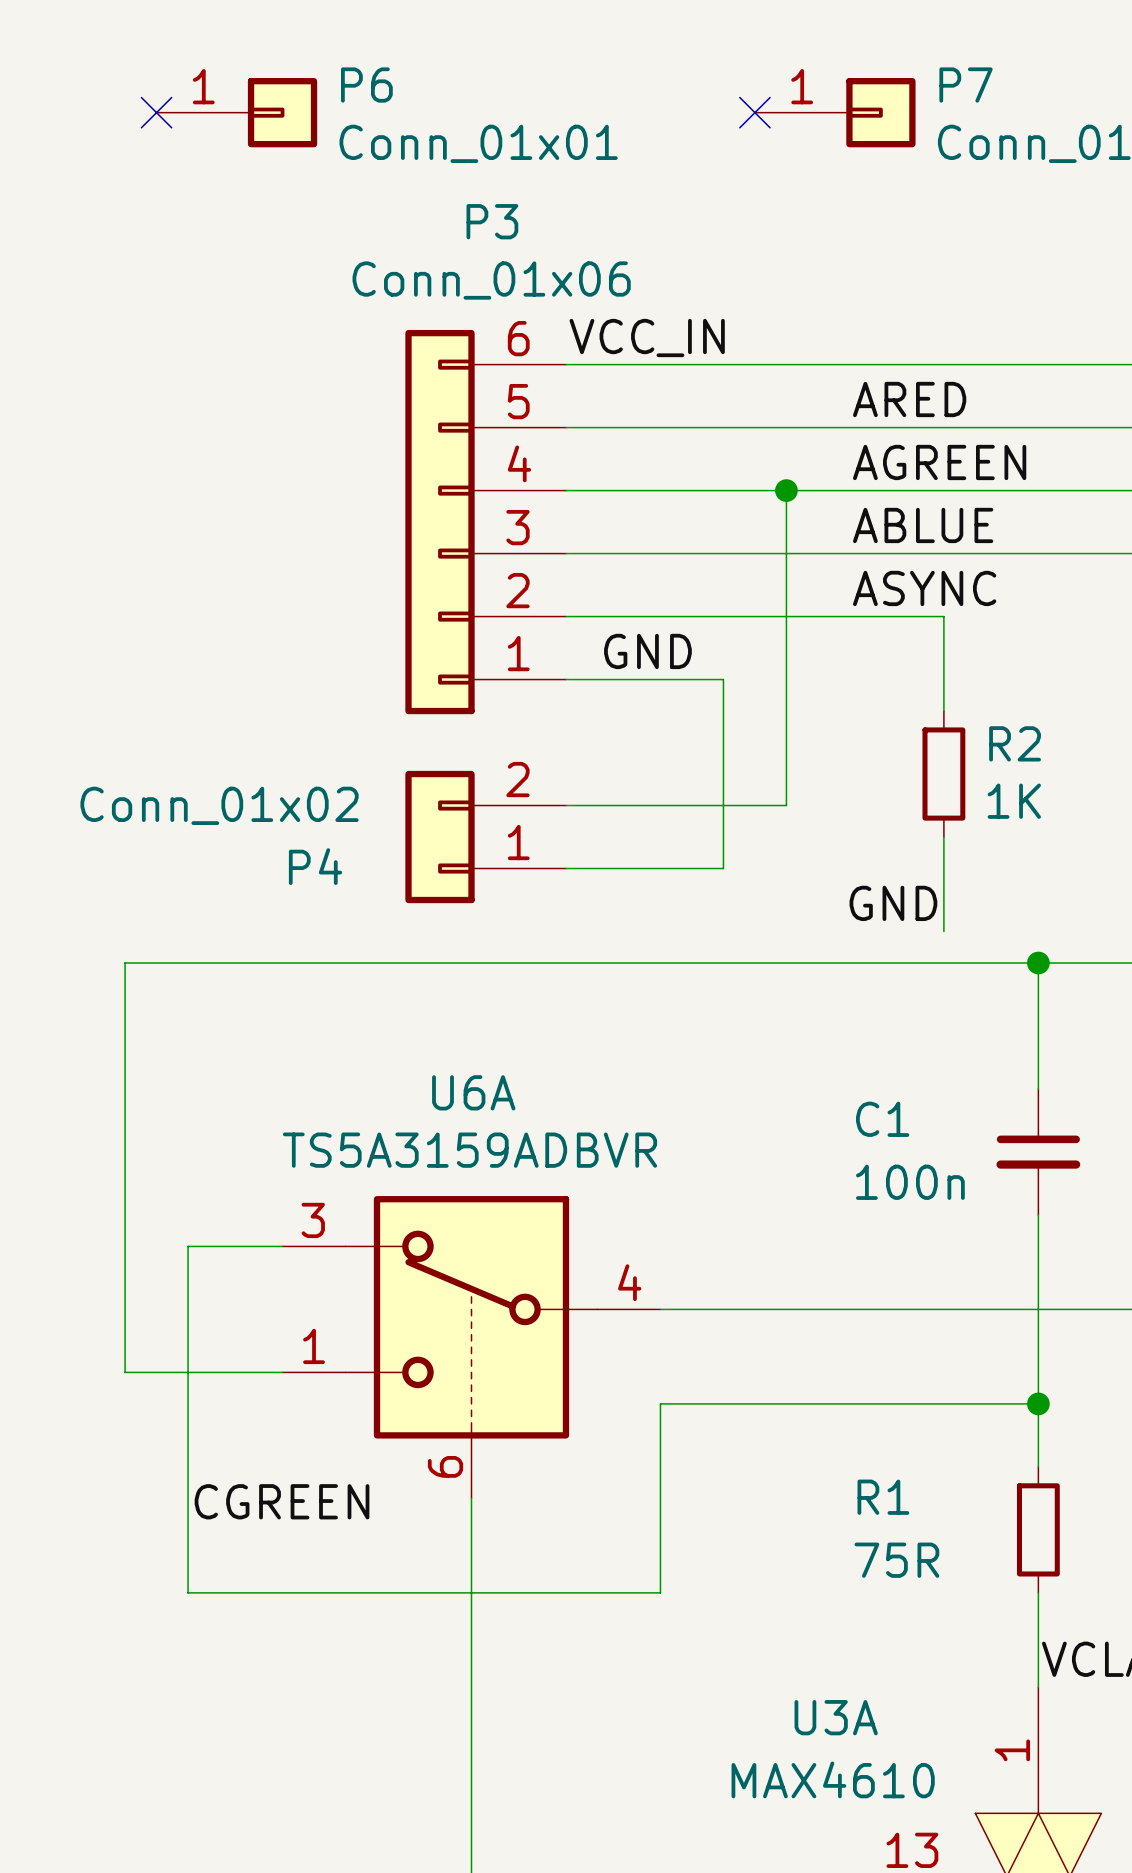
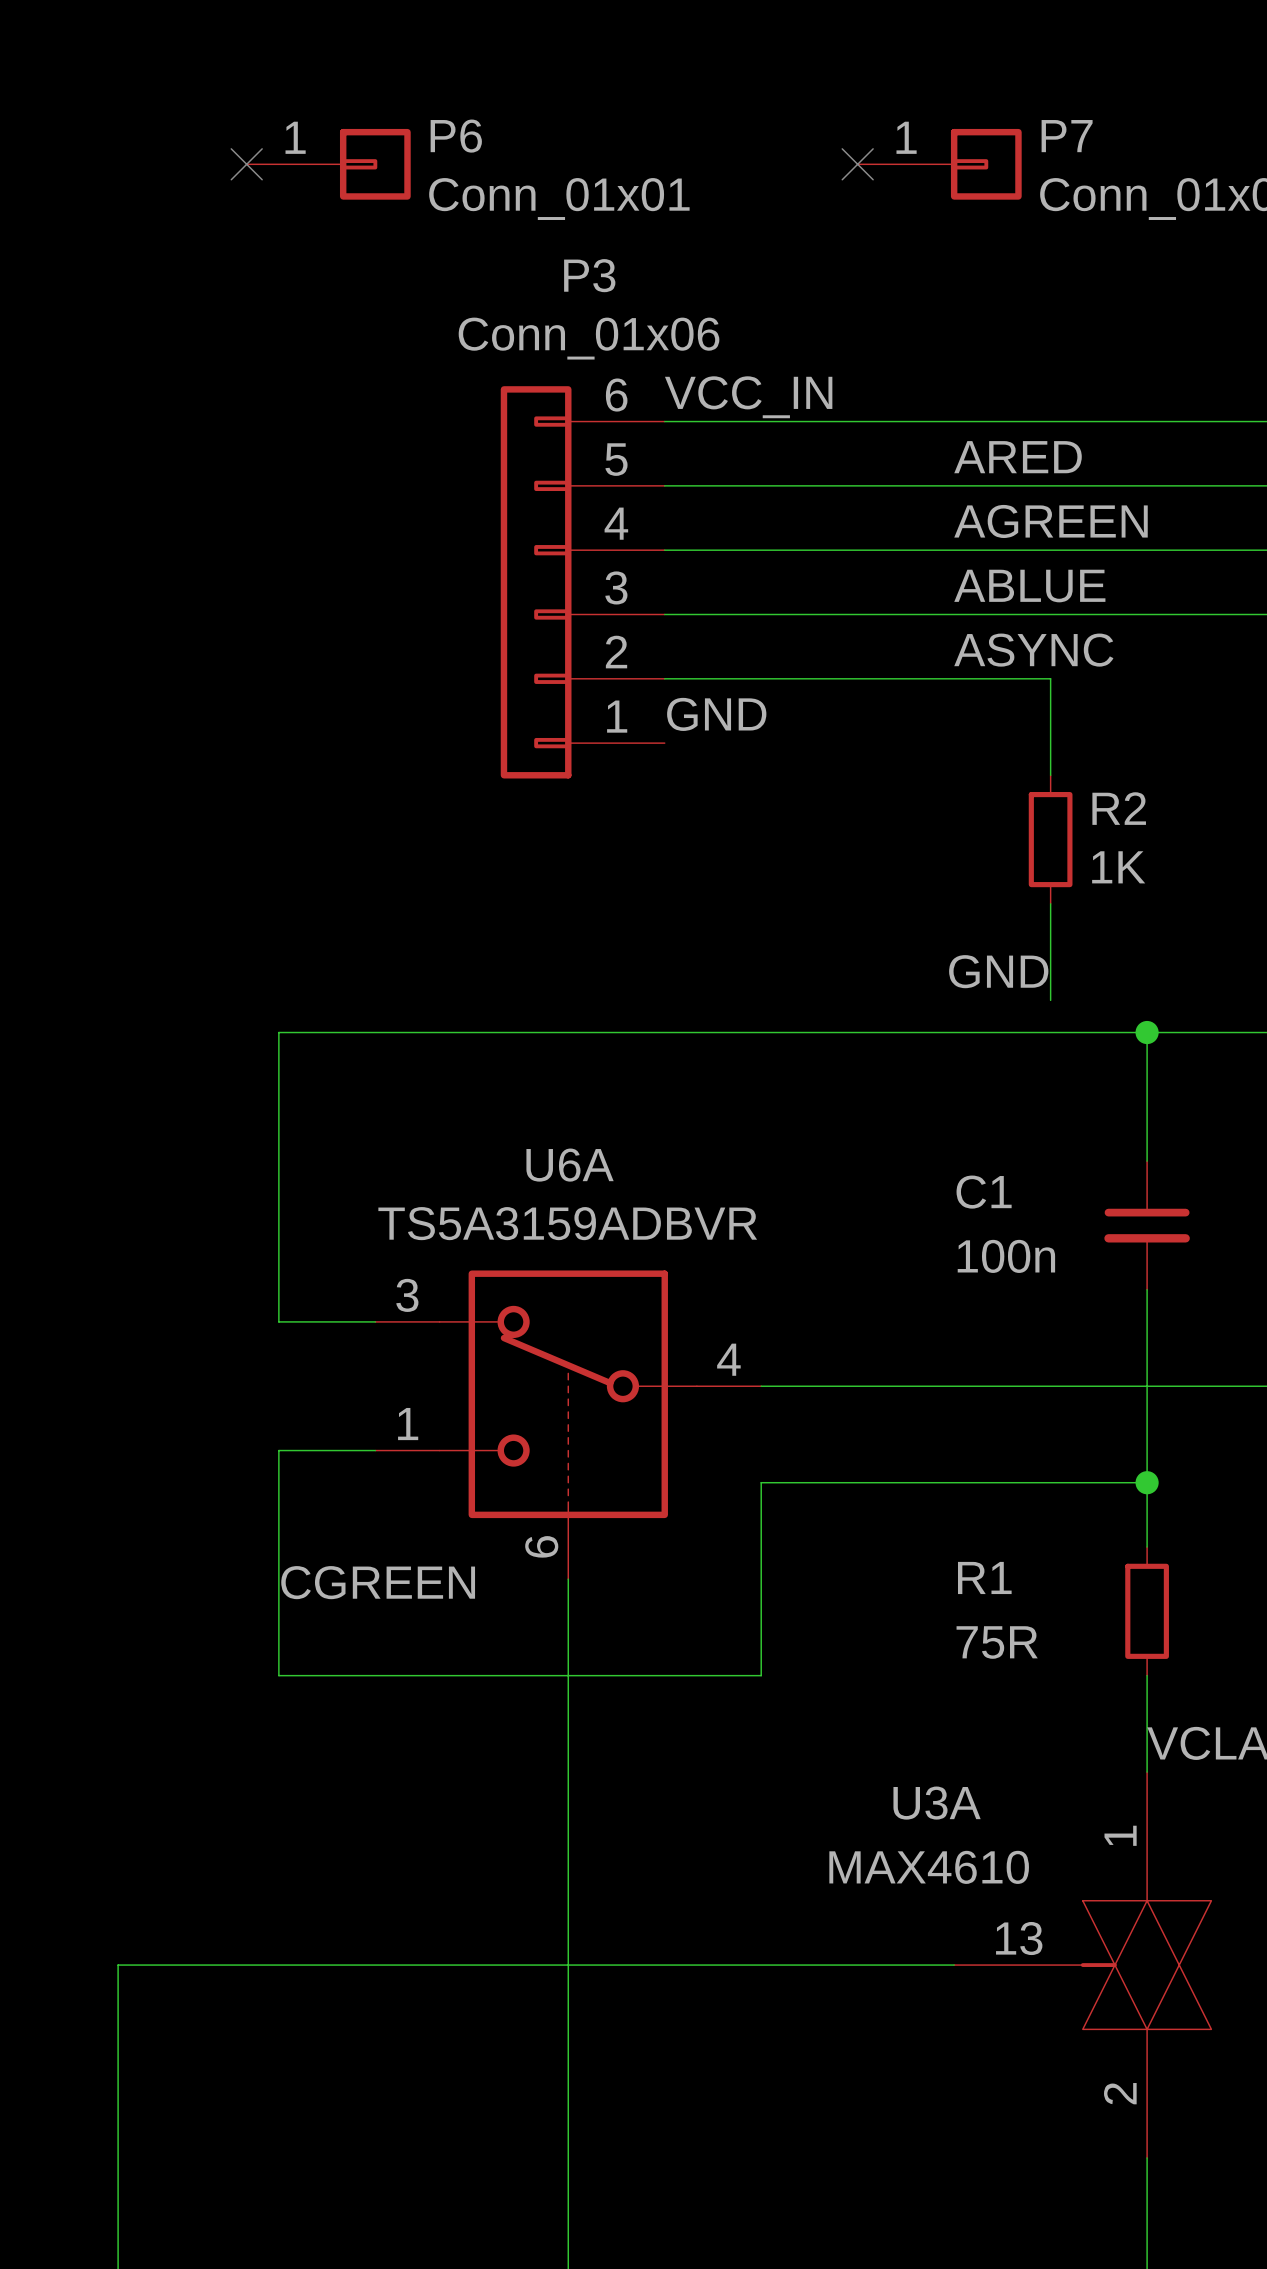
wire: (786, 490) (786, 805) (565, 805) -> none
junction: (786, 490) -> none
label position: GND (647, 651) -> GND (716, 714)
wire: (565, 679) (723, 679) (723, 868) (565, 868) -> none
P4: Conn_01x02 (485, 837) -> none
wire: (188, 962) (125, 962) (125, 1372) (188, 1372) (188, 1246) -> (278, 1032) (278, 1321)

